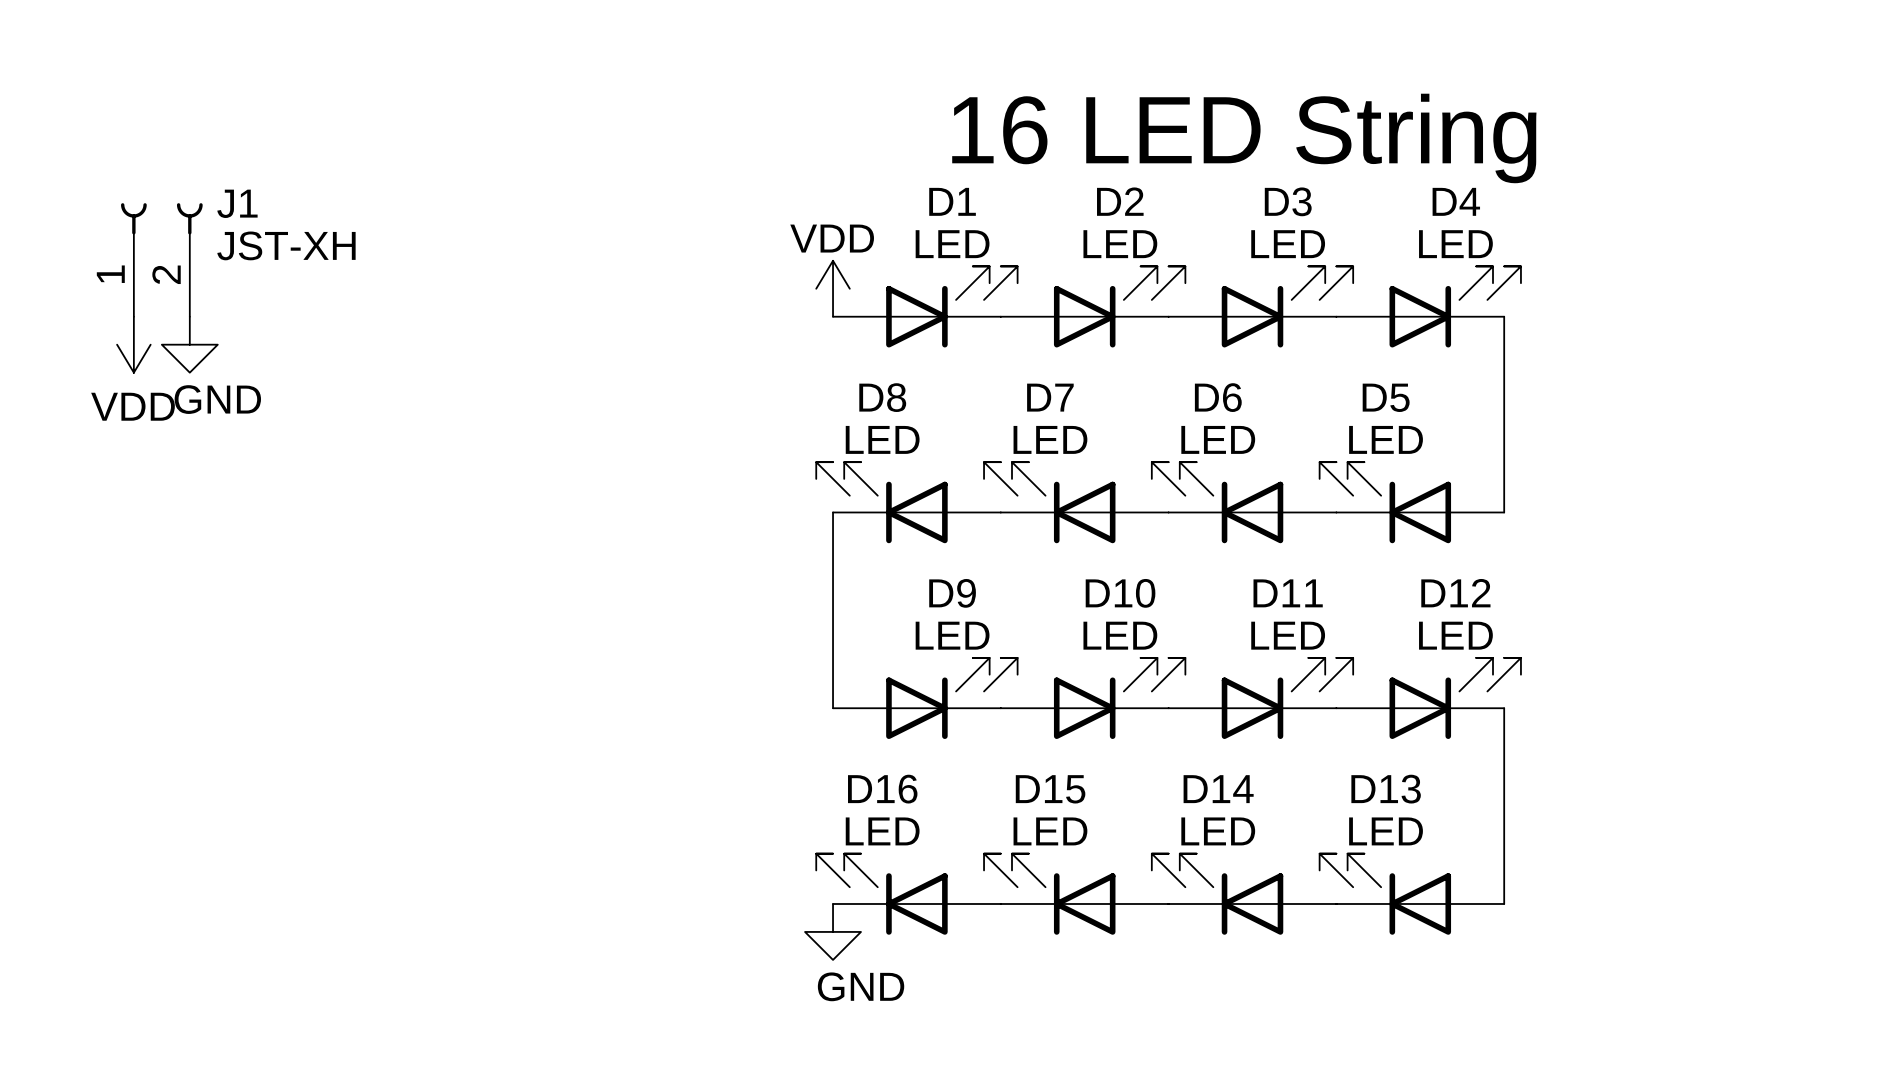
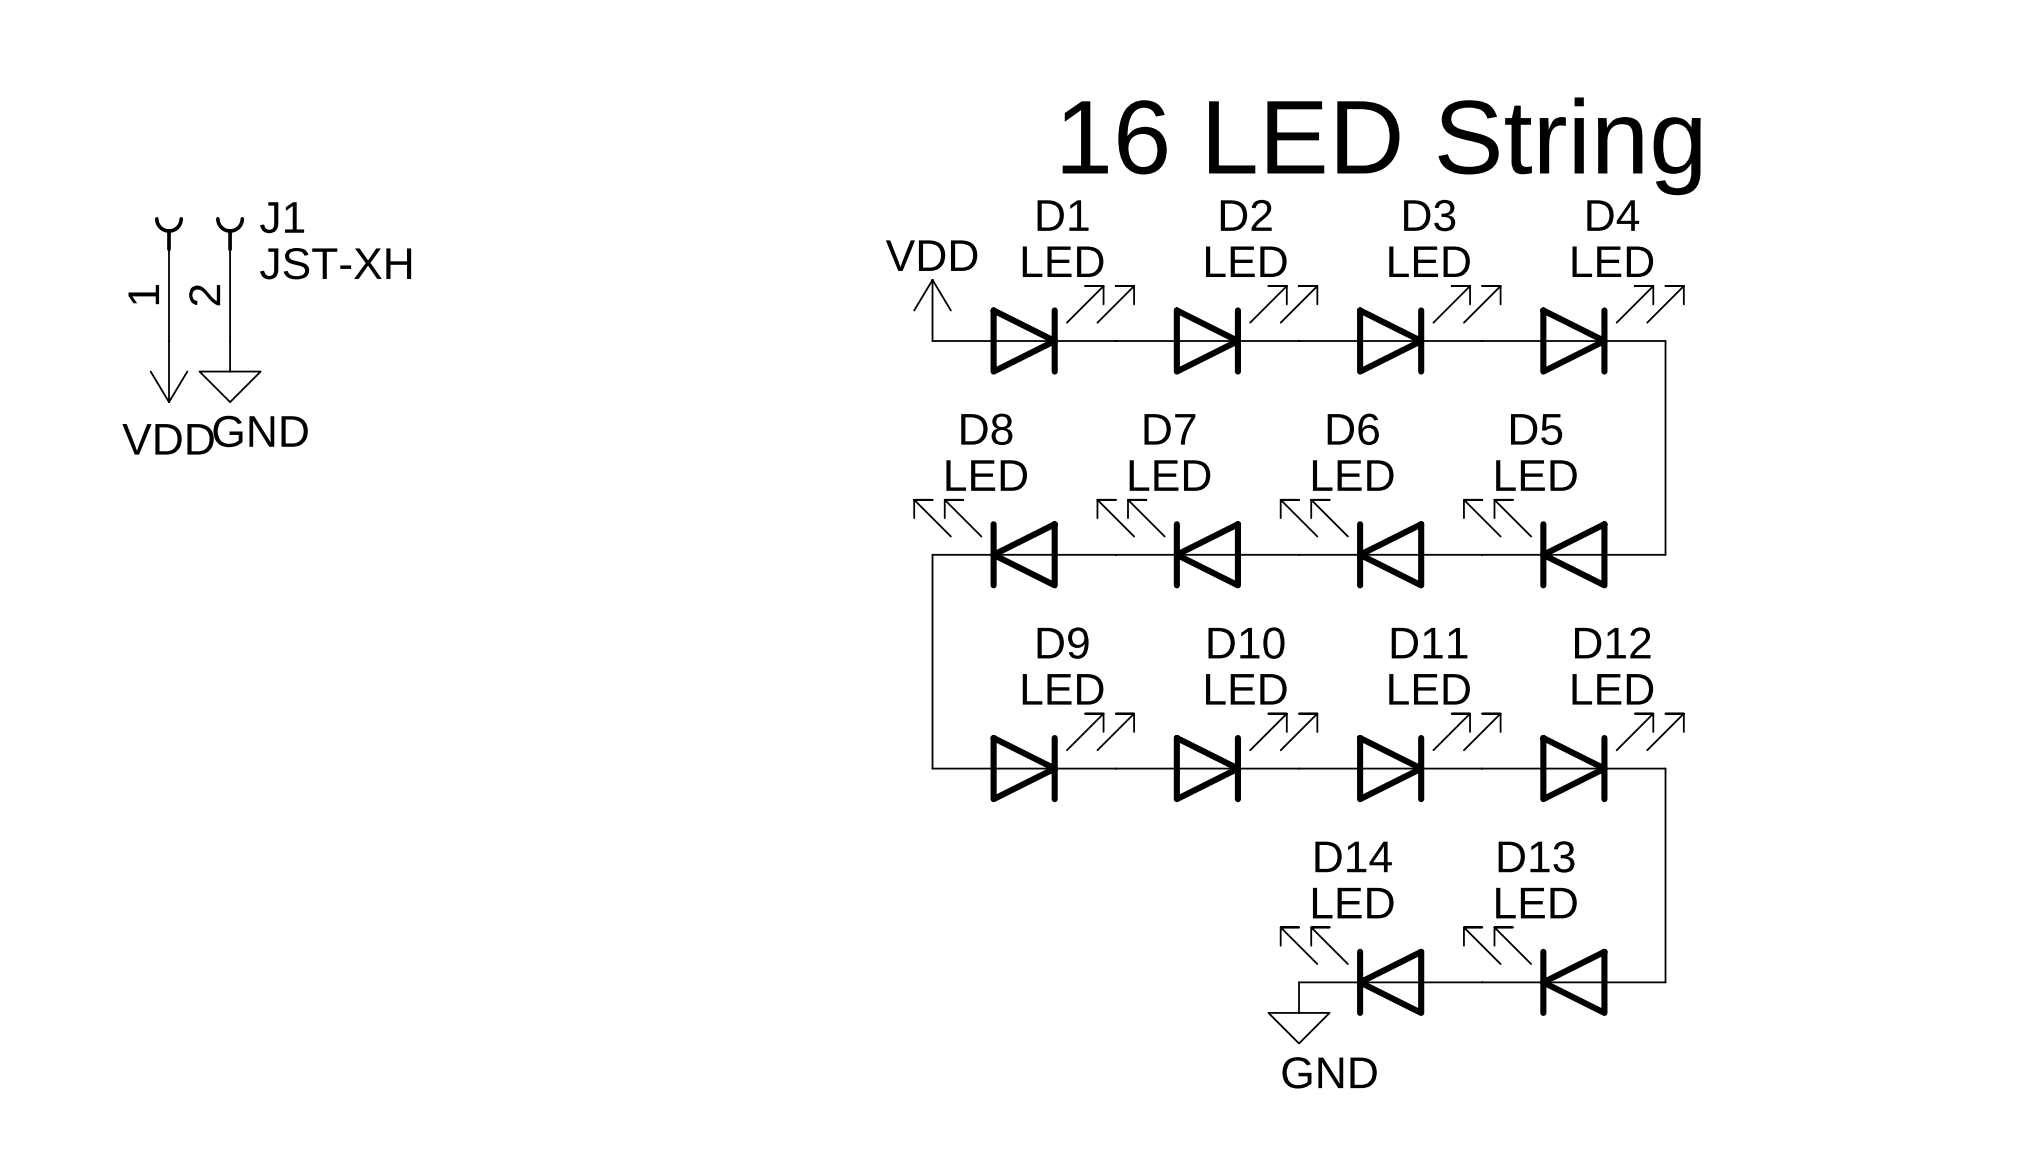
D16: LED (908, 894) -> none
D15: LED (1076, 894) -> none
power symbol position: GND (833, 931) -> GND (1299, 1012)

